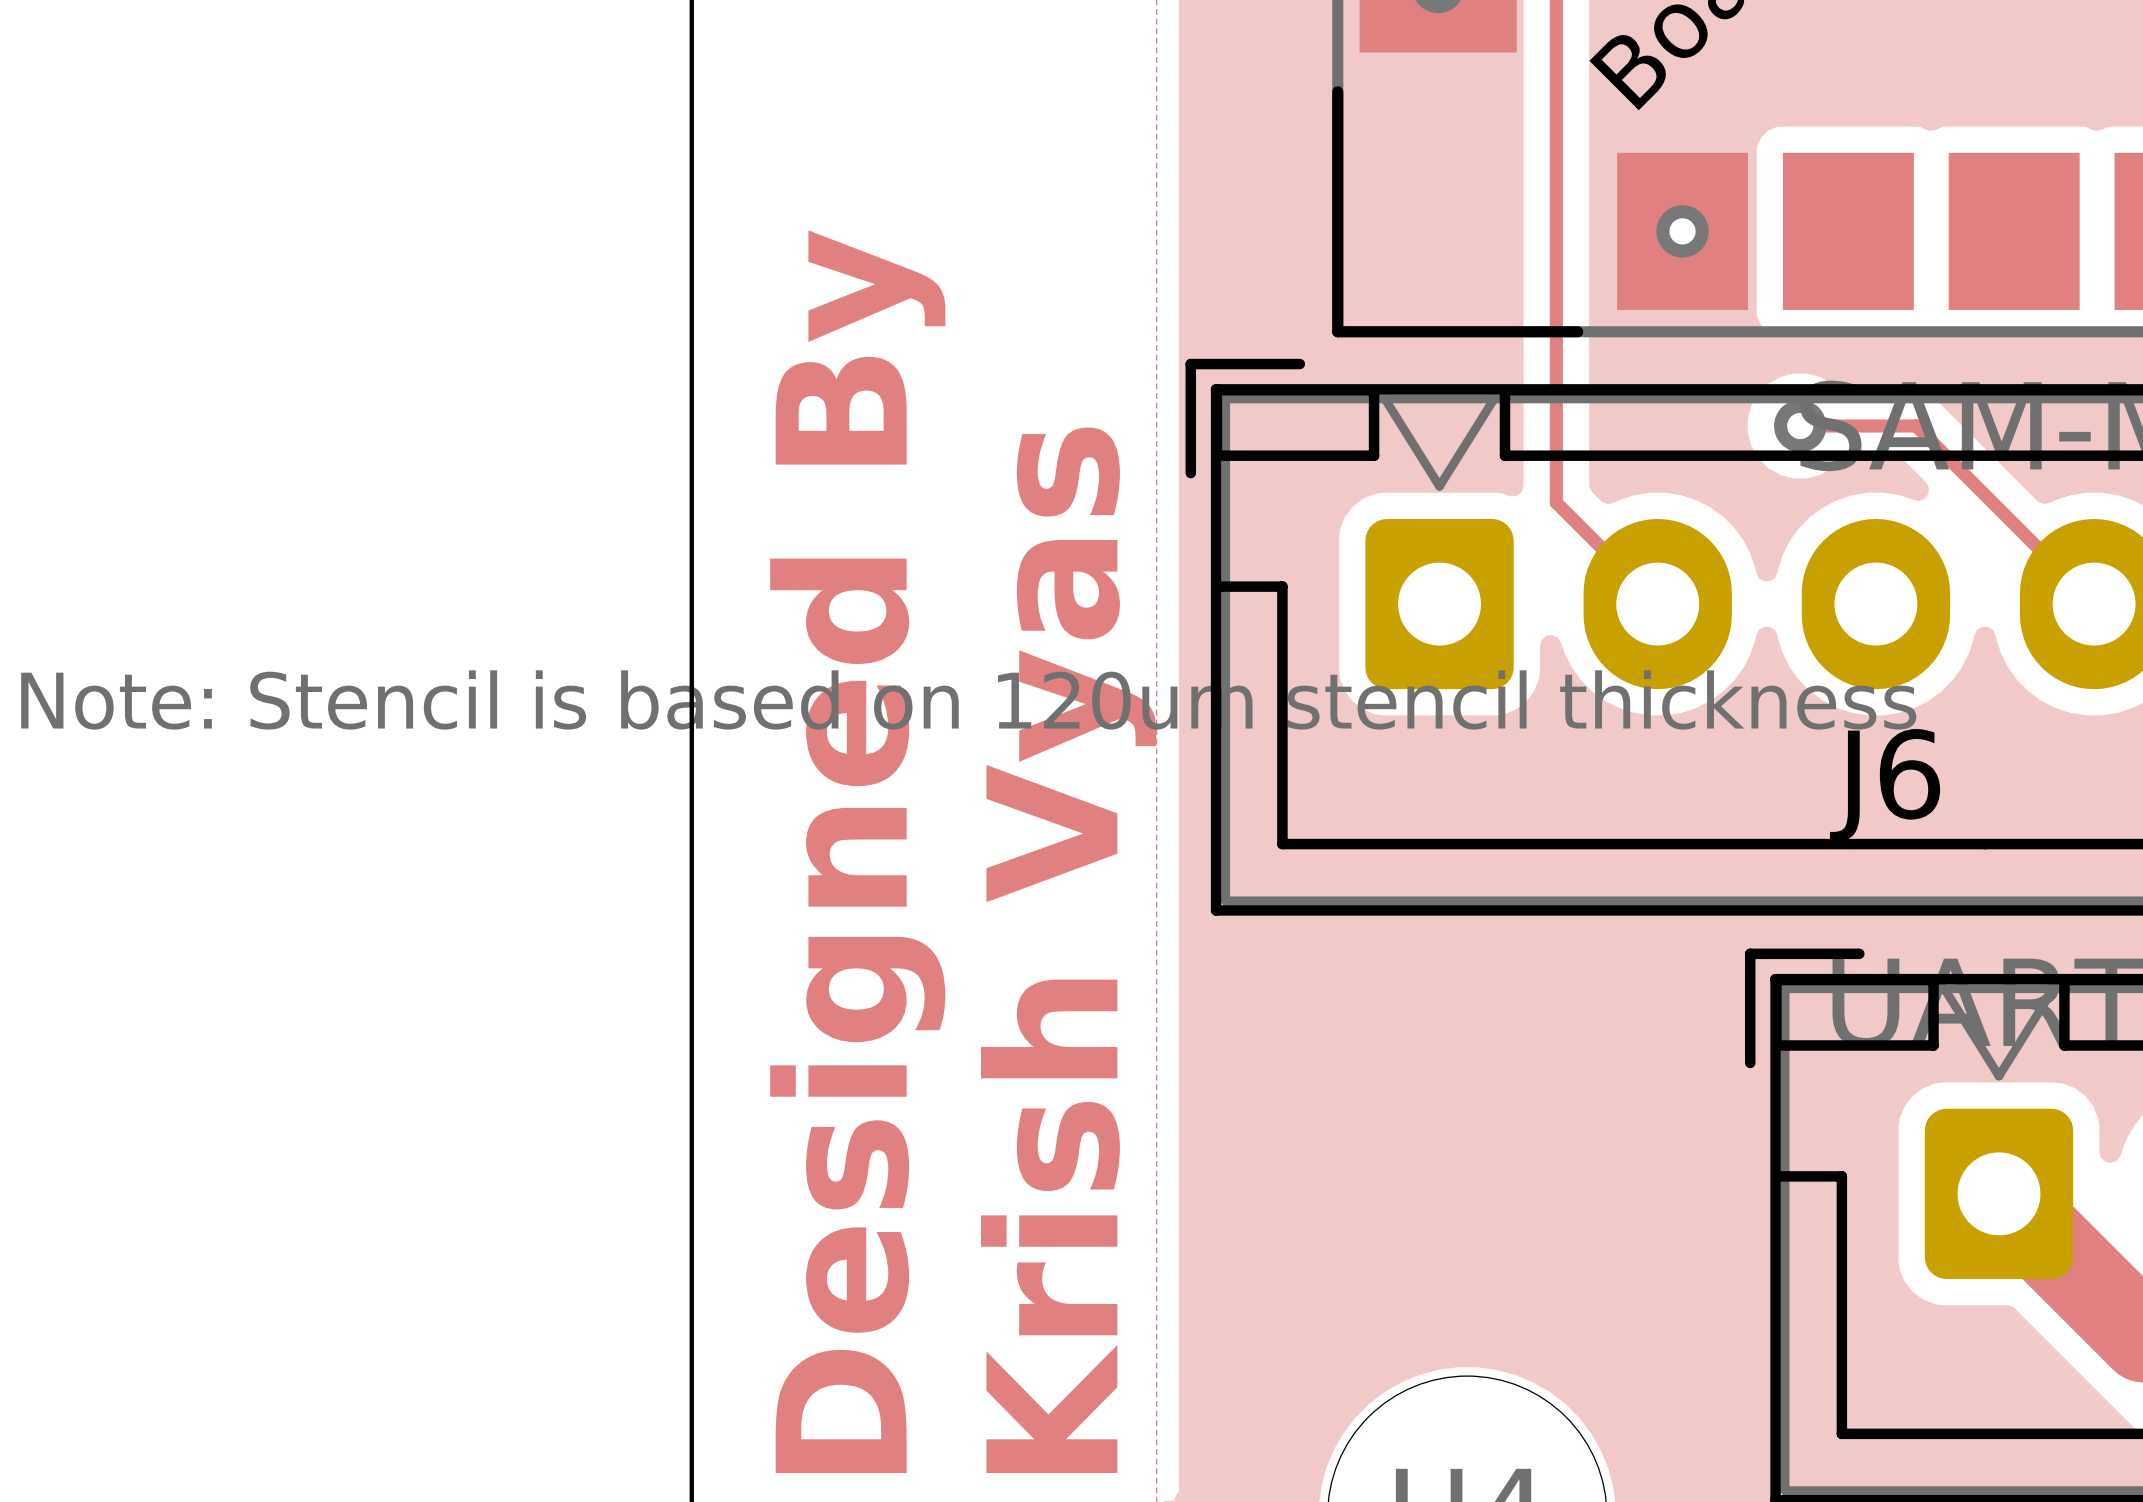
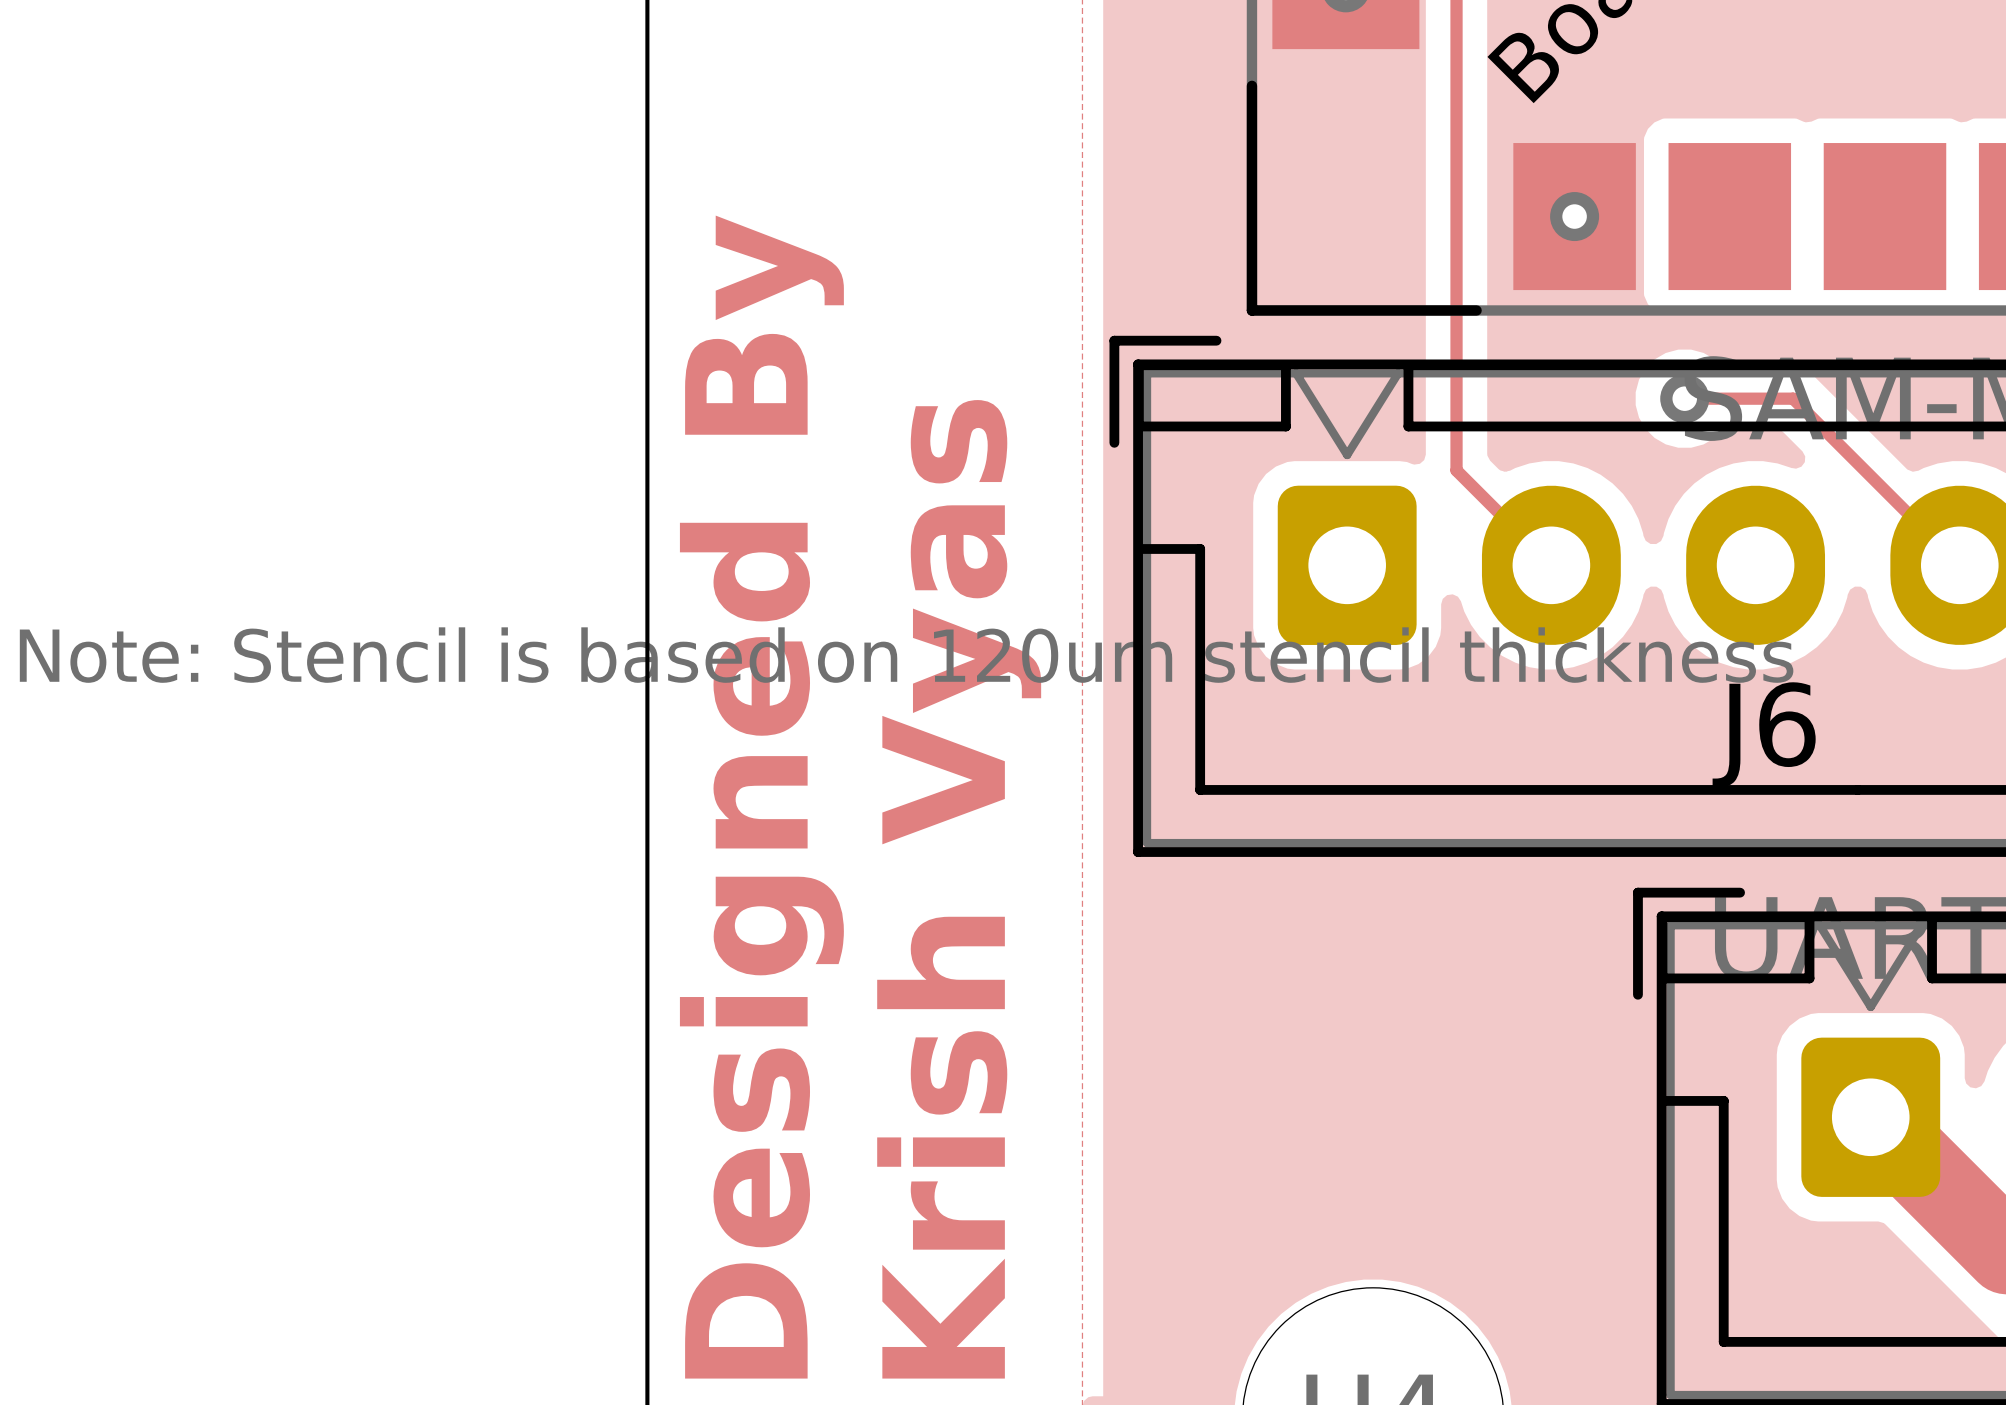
text position: Designed By (857, 851) -> Designed By (761, 797)
text position: Krish Vyas (1068, 950) -> Krish Vyas (959, 889)

